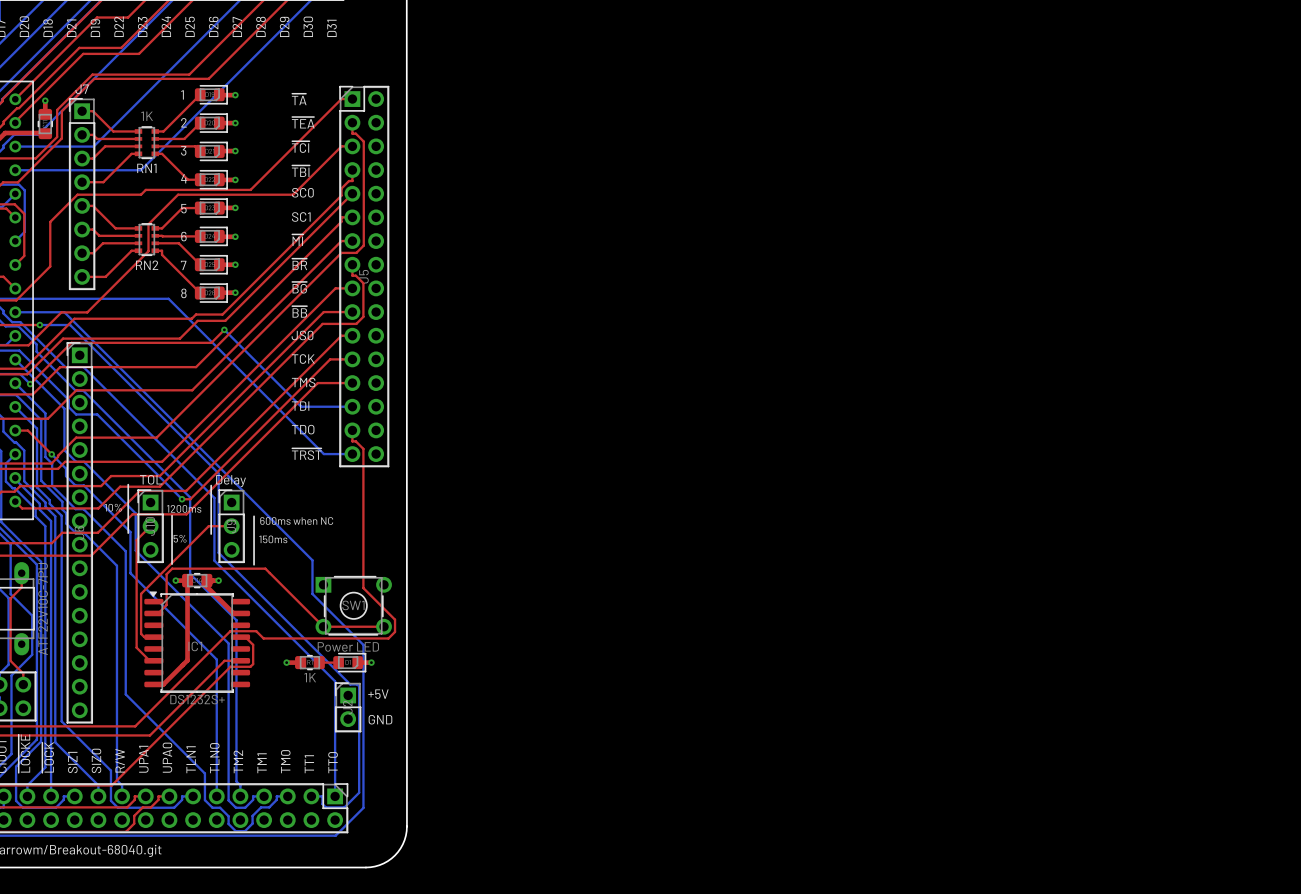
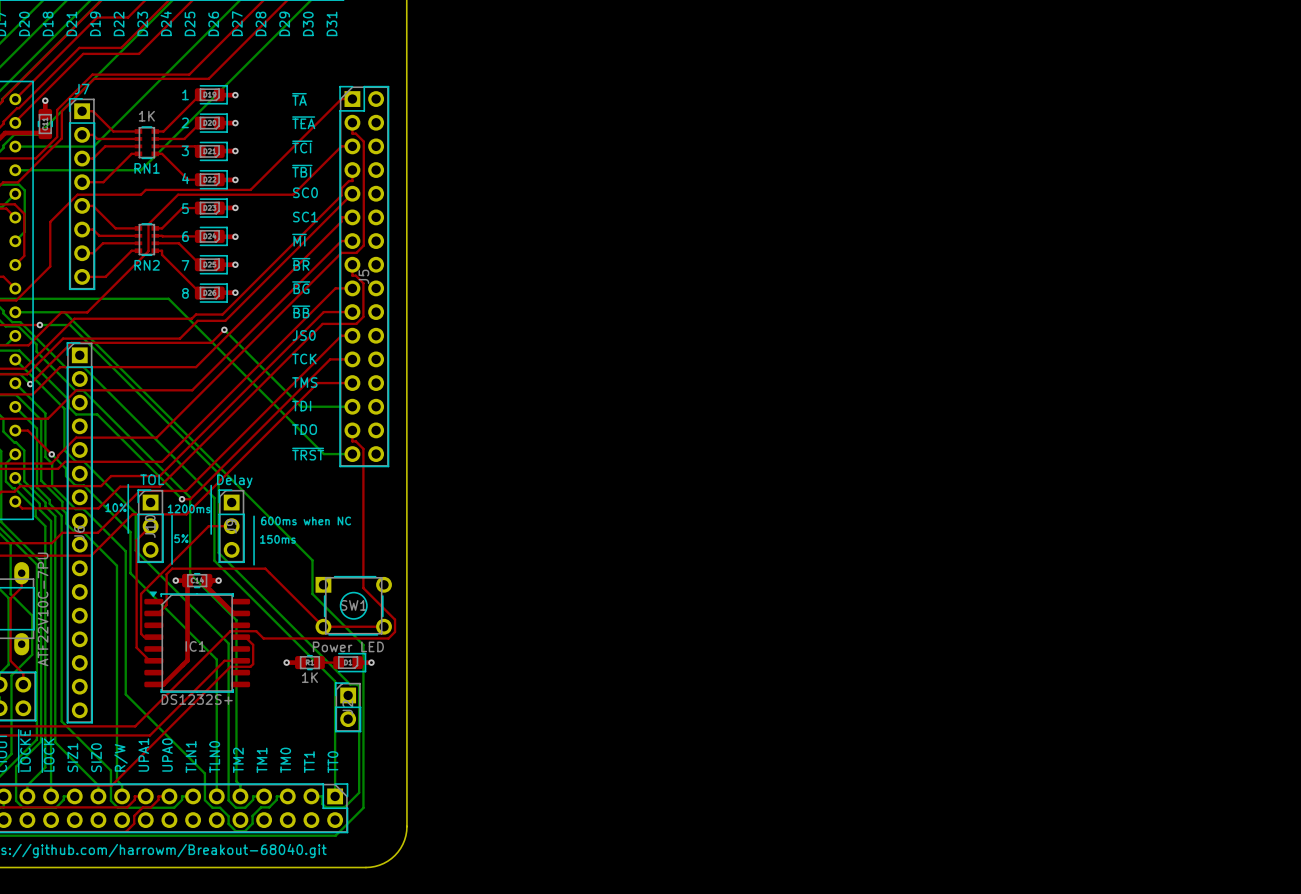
text: +5V (378, 694) -> none
text: GND (380, 719) -> none

